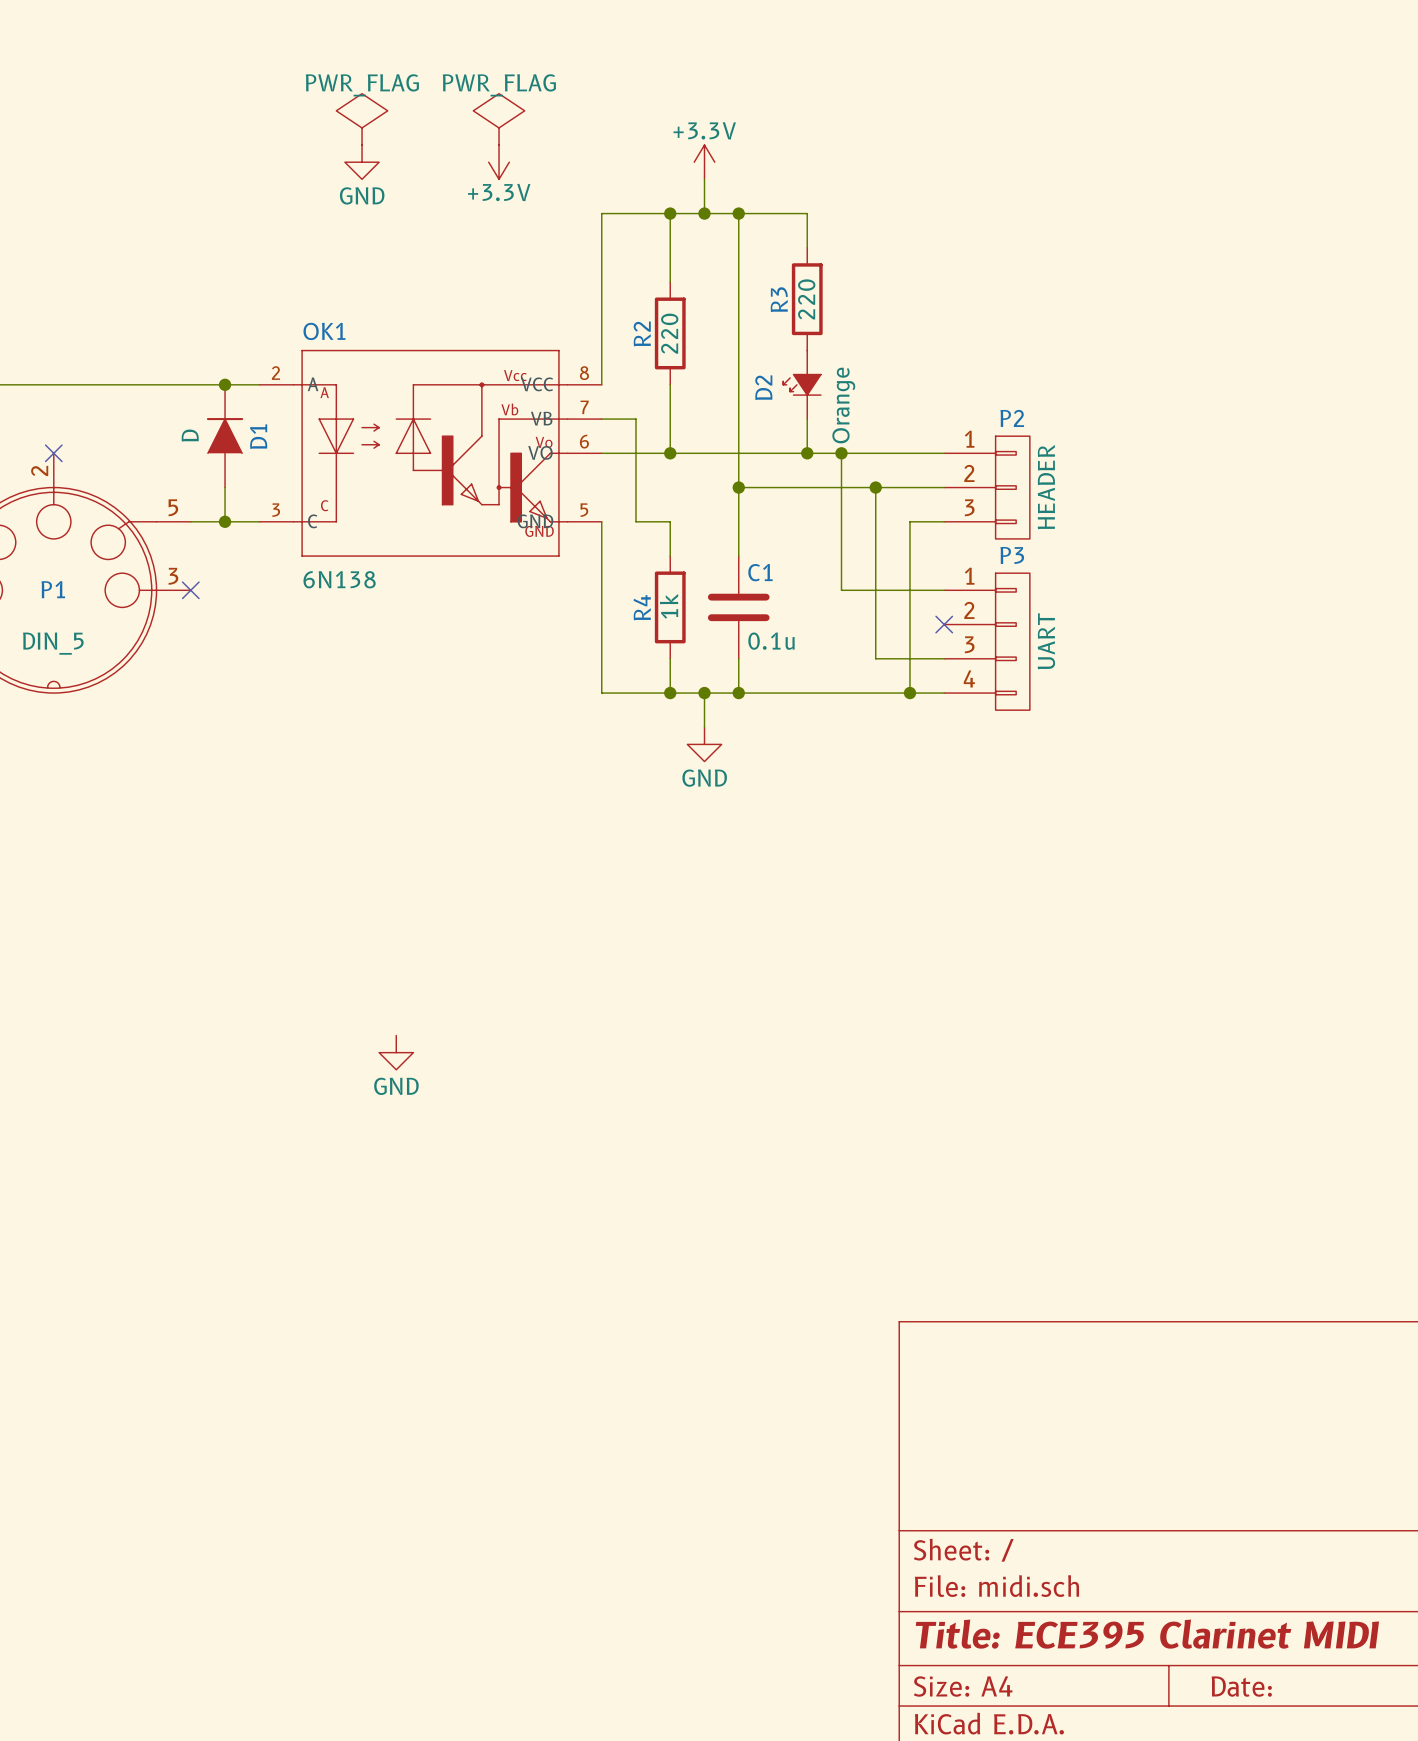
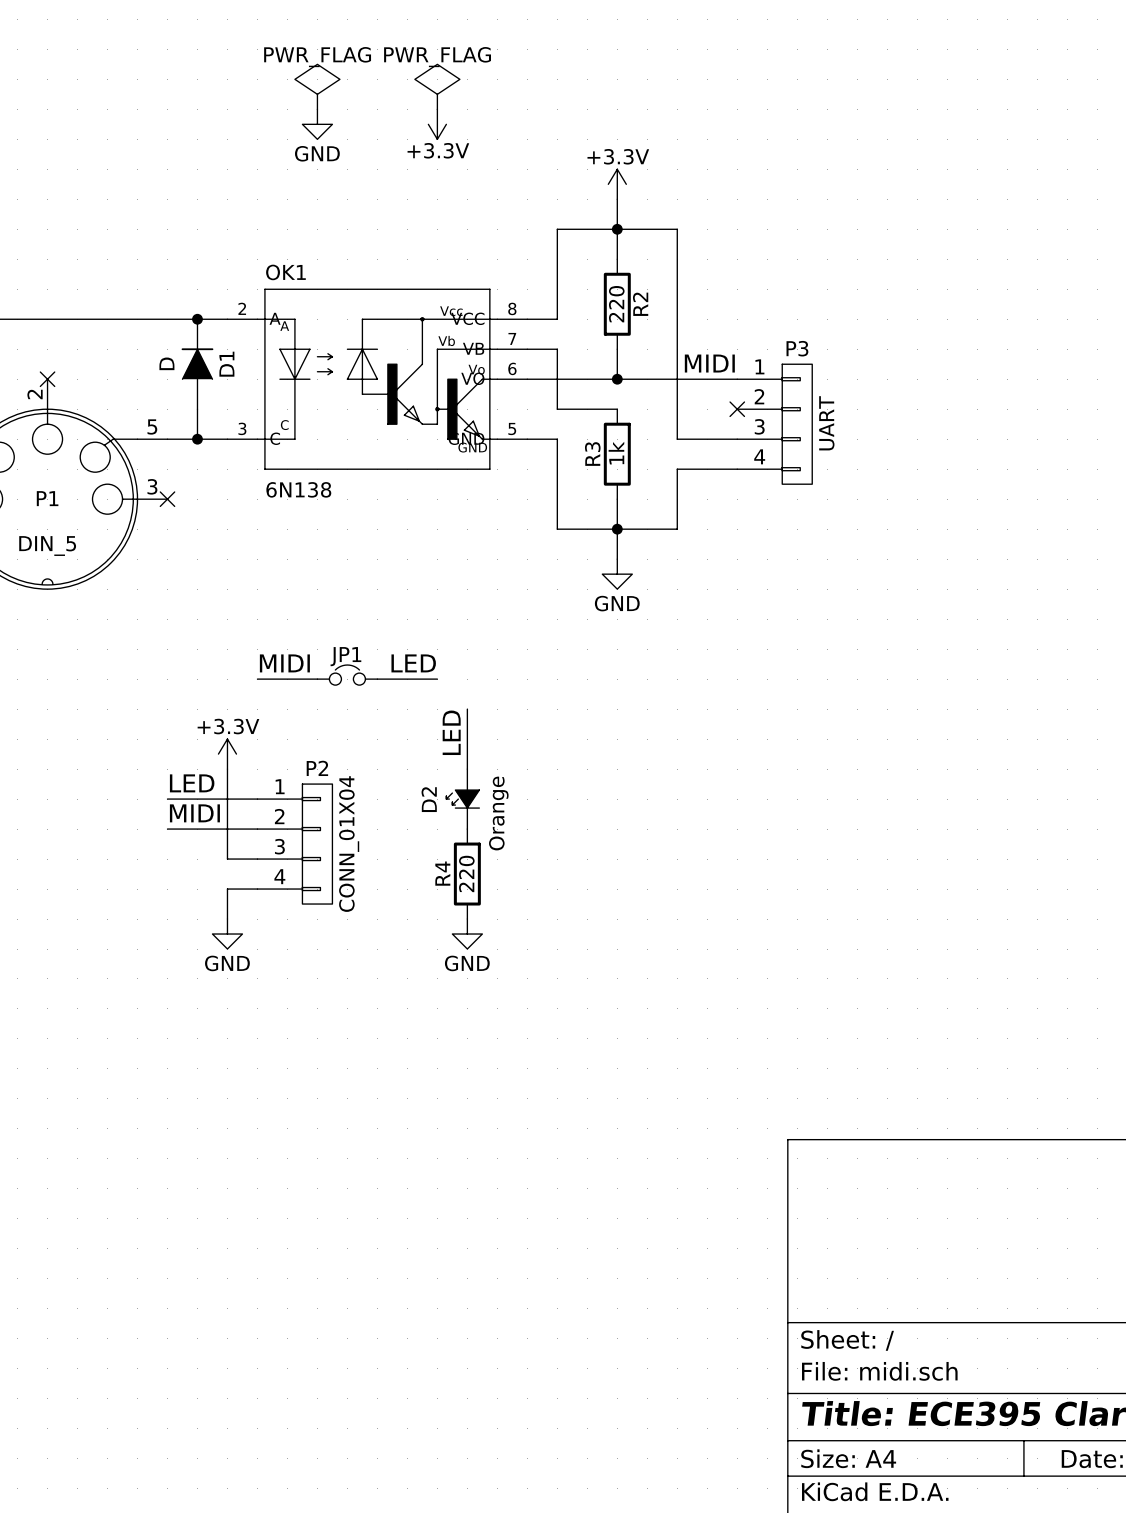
power symbol position: +3.3V (704, 162) -> +3.3V (617, 184)
wire: (704, 179) (704, 213) -> none
wire: (670, 213) (670, 282) -> (617, 199) (617, 259)
junction: (670, 213) -> none
junction: (704, 213) -> none
wire: (738, 213) (738, 556) -> none
junction: (738, 213) -> none
wire: (807, 247) (807, 213) (601, 213) (601, 384) -> (737, 439) (677, 439) (677, 229) (557, 229) (557, 319) (527, 319)
junction: none -> (617, 229)
R3 value: 220 (806, 299) -> 1k (616, 453)
R3 position: (807, 299) -> (617, 454)
R2 name position: R2 (642, 333) -> R2 (640, 304)
R2 position: (670, 333) -> (617, 304)
wire: (670, 384) (670, 453) -> (617, 499) (617, 559)
D2 position: (802, 384) -> (462, 799)
wire: (807, 419) (807, 453) -> (617, 349) (617, 379)
label: none -> MIDI (709, 363)
P2 symbol: [944, 436, 1030, 539] -> [257, 784, 333, 905]
junction: (670, 453) -> none
junction: none -> (617, 379)
junction: (807, 453) -> none
junction: (841, 453) -> none
wire: (944, 453) (841, 453) (841, 590) (944, 590) -> none
wire: (636, 487) (636, 521) (670, 521) (670, 556) -> (557, 409) (617, 409)
wire: (738, 487) (944, 487) -> none
junction: (738, 487) -> none
no-connect mark: none -> (737, 409)
wire: (875, 487) (875, 658) (944, 658) -> none
junction: (875, 487) -> none
P2 value: HEADER (1046, 487) -> CONN_01X04 (349, 844)
wire: (601, 521) (601, 693) (944, 693) -> (527, 439) (557, 439) (557, 529) (677, 529) (677, 469) (737, 469)
wire: (944, 521) (909, 521) (909, 693) -> none
R4 value: 1k (669, 606) -> 220 (466, 873)
R4 position: (670, 607) -> (467, 874)
C1: 0.1u (738, 607) -> none
junction: none -> (617, 529)
no-connect mark: (944, 624) -> none
P3 position: (987, 641) -> (774, 424)
wire: (670, 658) (670, 693) -> none
wire: (738, 658) (738, 693) -> none
junction: (670, 693) -> none
wire: (704, 693) (704, 727) -> none
junction: (704, 693) -> none
junction: (738, 693) -> none
junction: (909, 693) -> none
power symbol position: GND (704, 744) -> GND (617, 574)
label: none -> MIDI (284, 663)
label: none -> LED (413, 663)
JP1: none -> (347, 675)
wire: none -> (257, 679) (317, 679)
wire: none -> (377, 679) (437, 679)
wire: none -> (467, 709) (467, 769)
label: none -> LED (451, 732)
power symbol: none -> +3.3V (227, 754)
wire: none -> (227, 769) (227, 859) (257, 859)
label: none -> LED (192, 783)
wire: none -> (167, 799) (257, 799)
label: none -> MIDI (194, 813)
wire: none -> (167, 829) (257, 829)
wire: none -> (257, 889) (227, 889) (227, 919)
power symbol: GND (396, 1052) -> none
power symbol: none -> GND (227, 934)
power symbol: none -> GND (467, 934)

